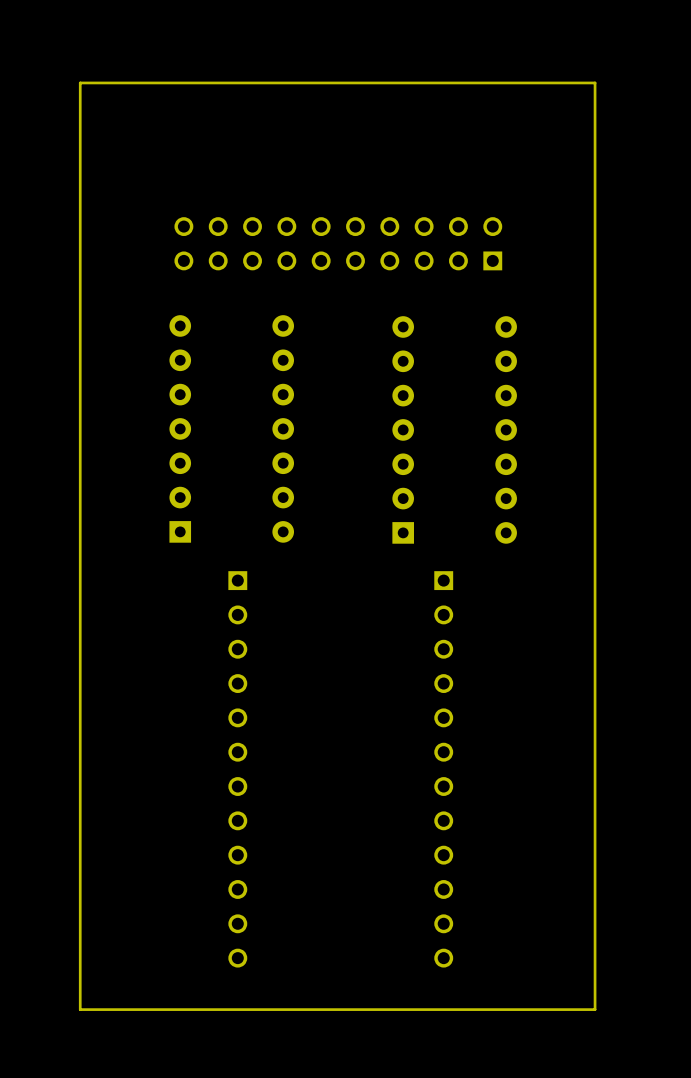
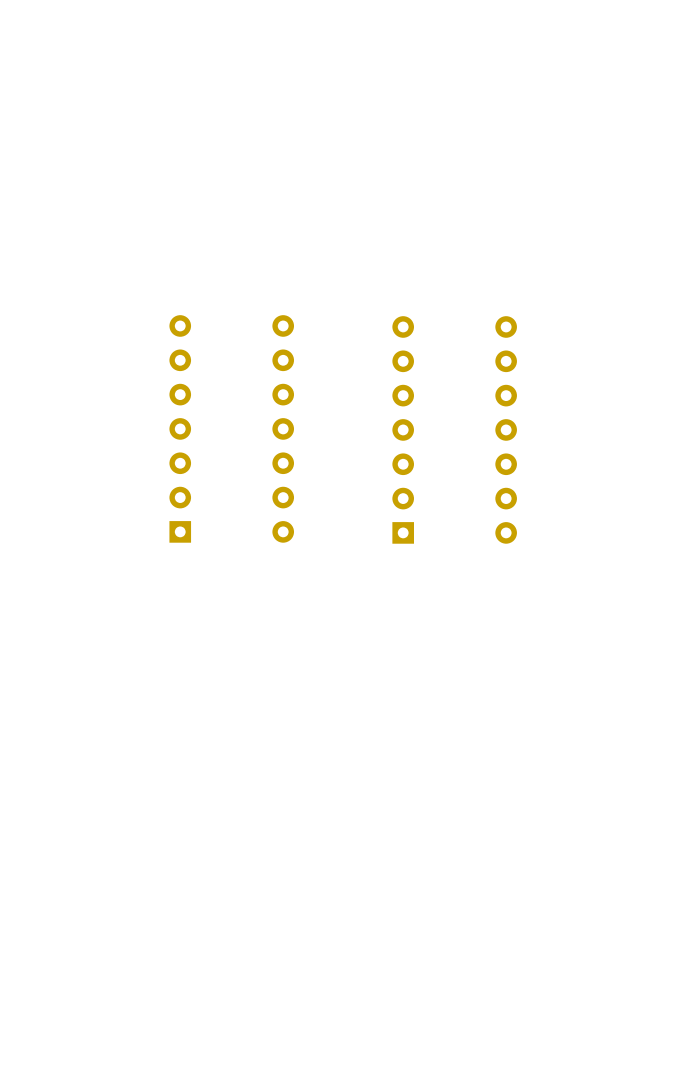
board edge: (595, 82) (80, 82) (80, 1009) (595, 1009) (595, 82) -> none
part: (338, 243) -> none
part: (237, 769) -> none
part: (443, 769) -> none

